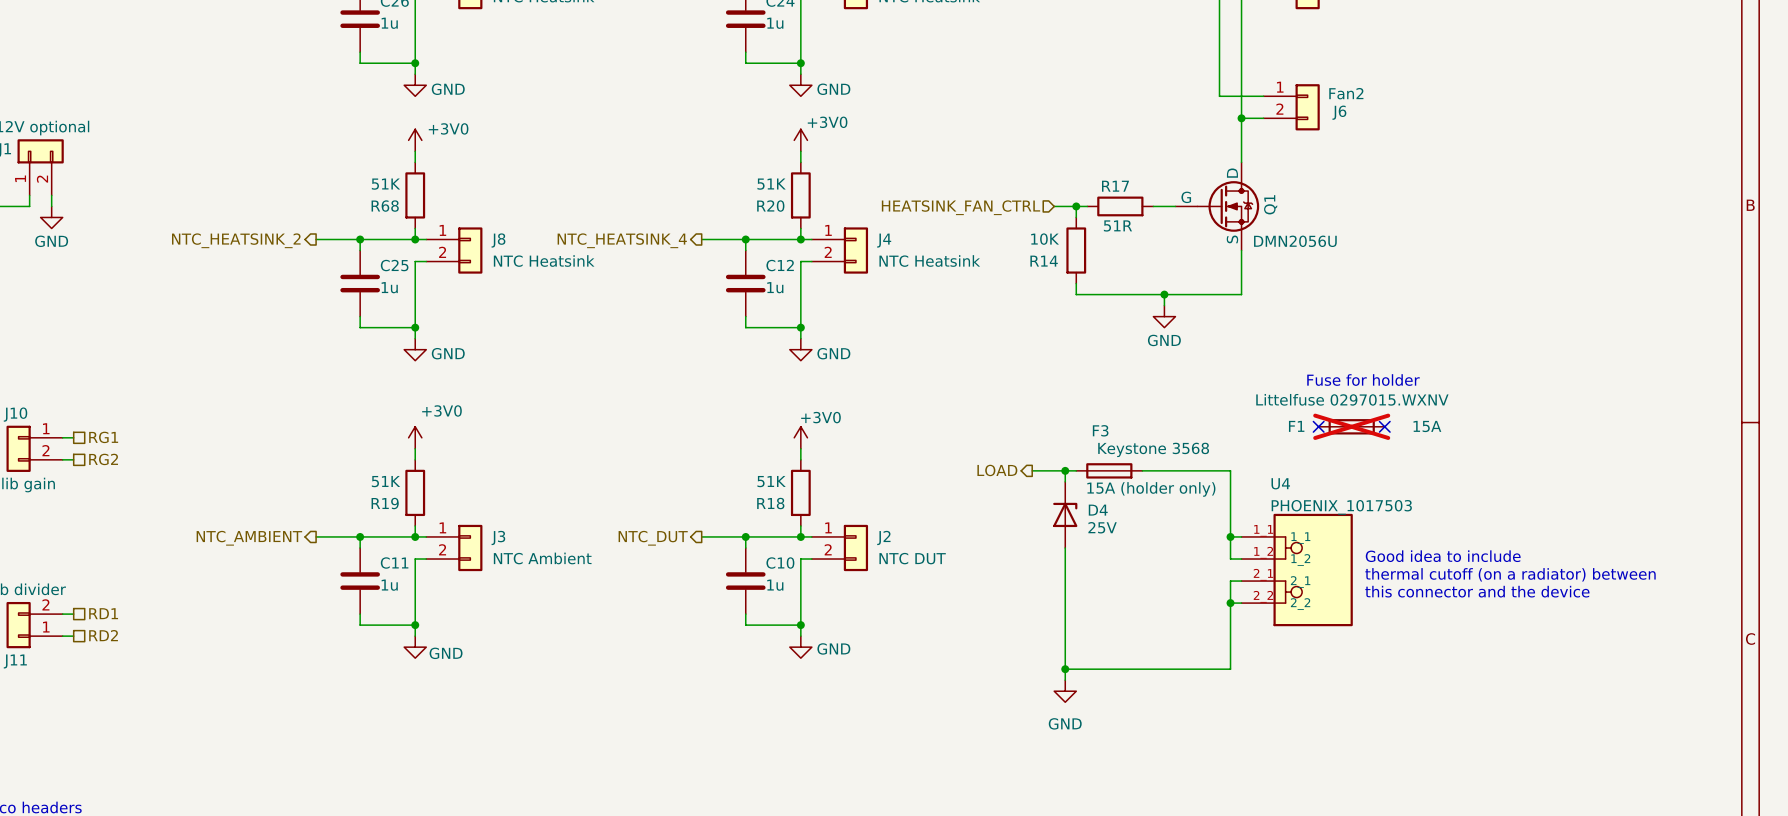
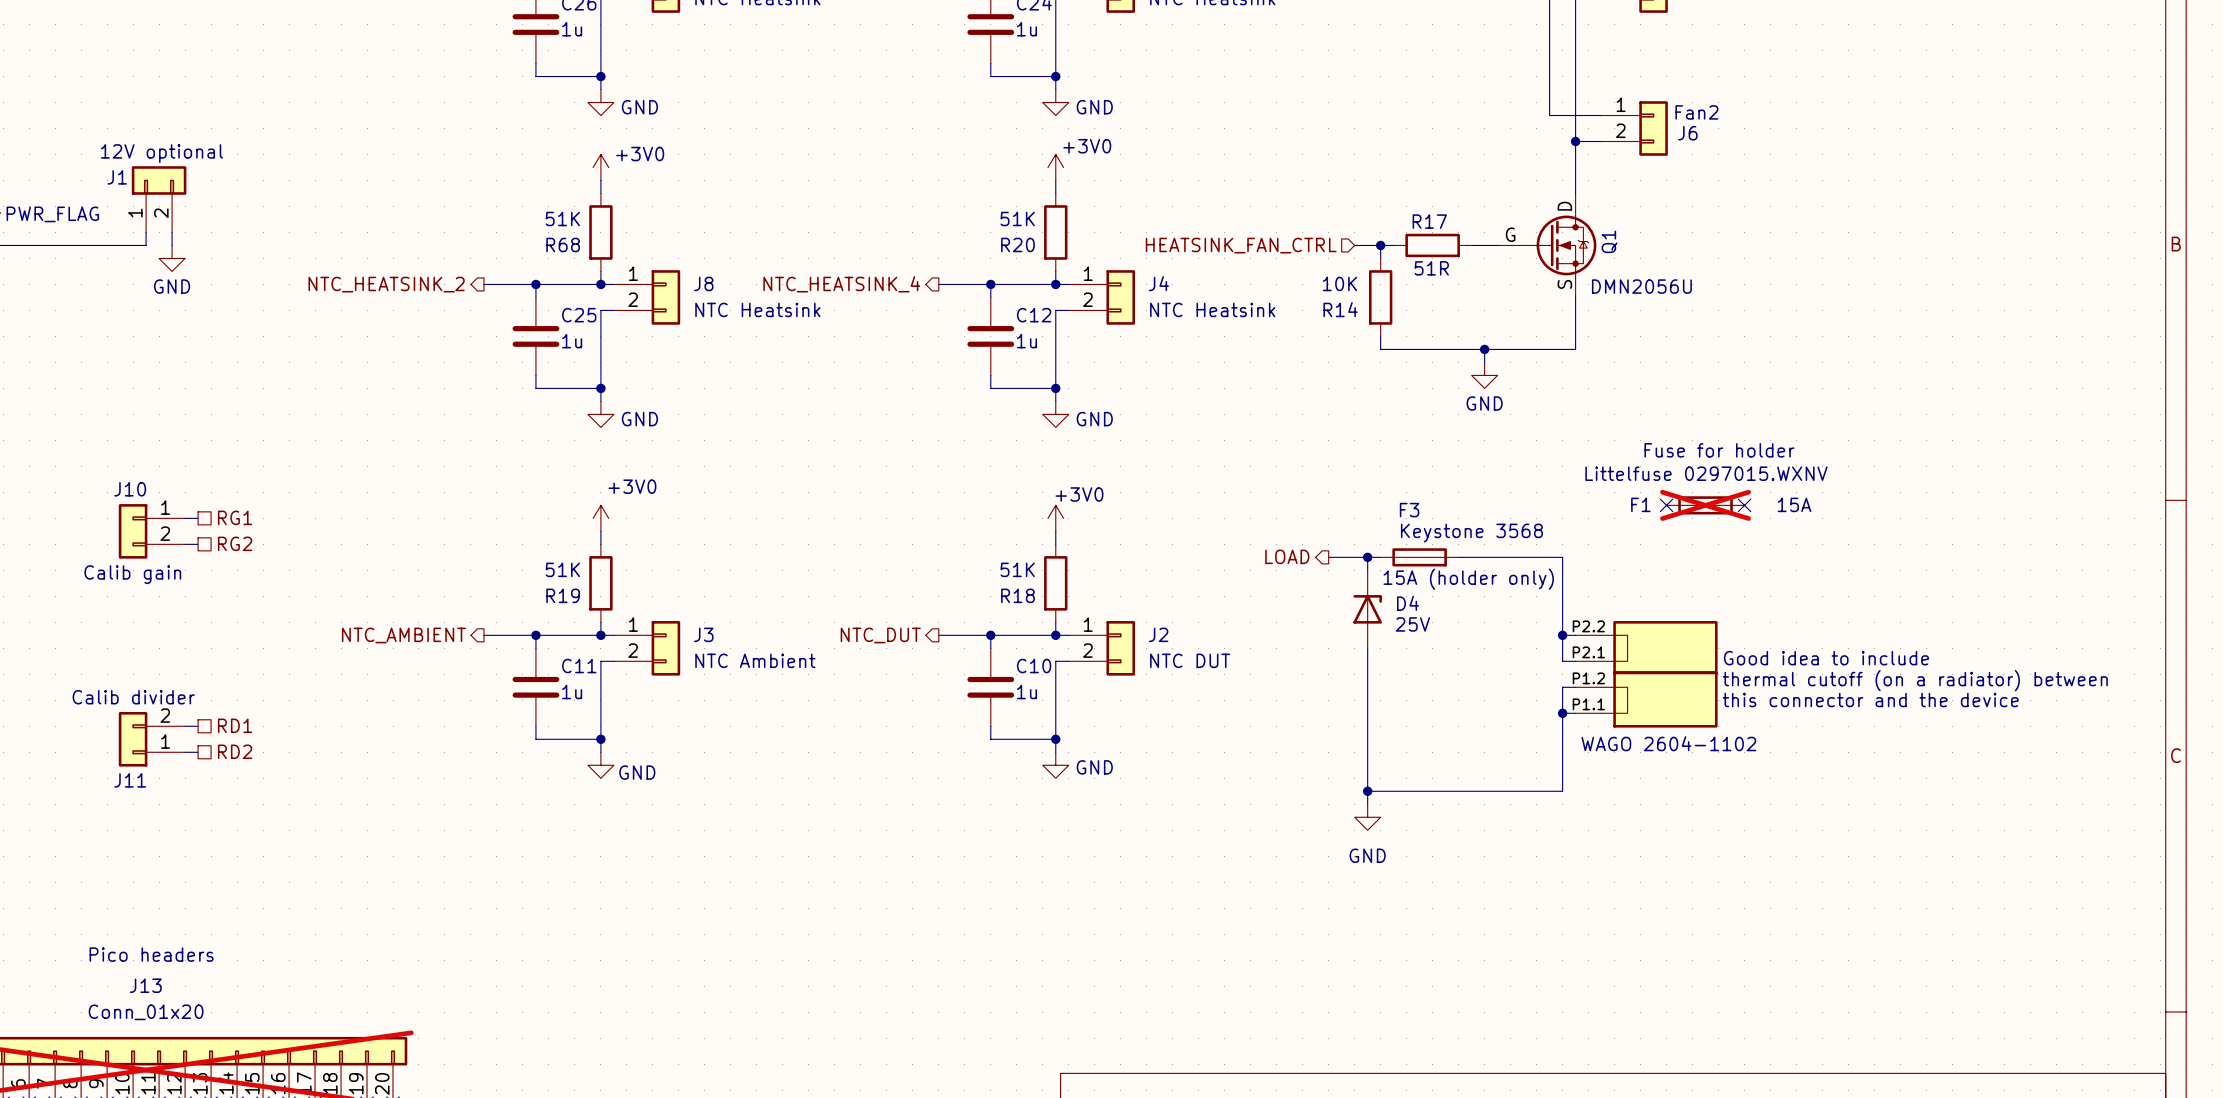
U4: PHOENIX_1017503 (1297, 570) -> none
part: none -> WAGO 2604-1102 (1646, 674)

